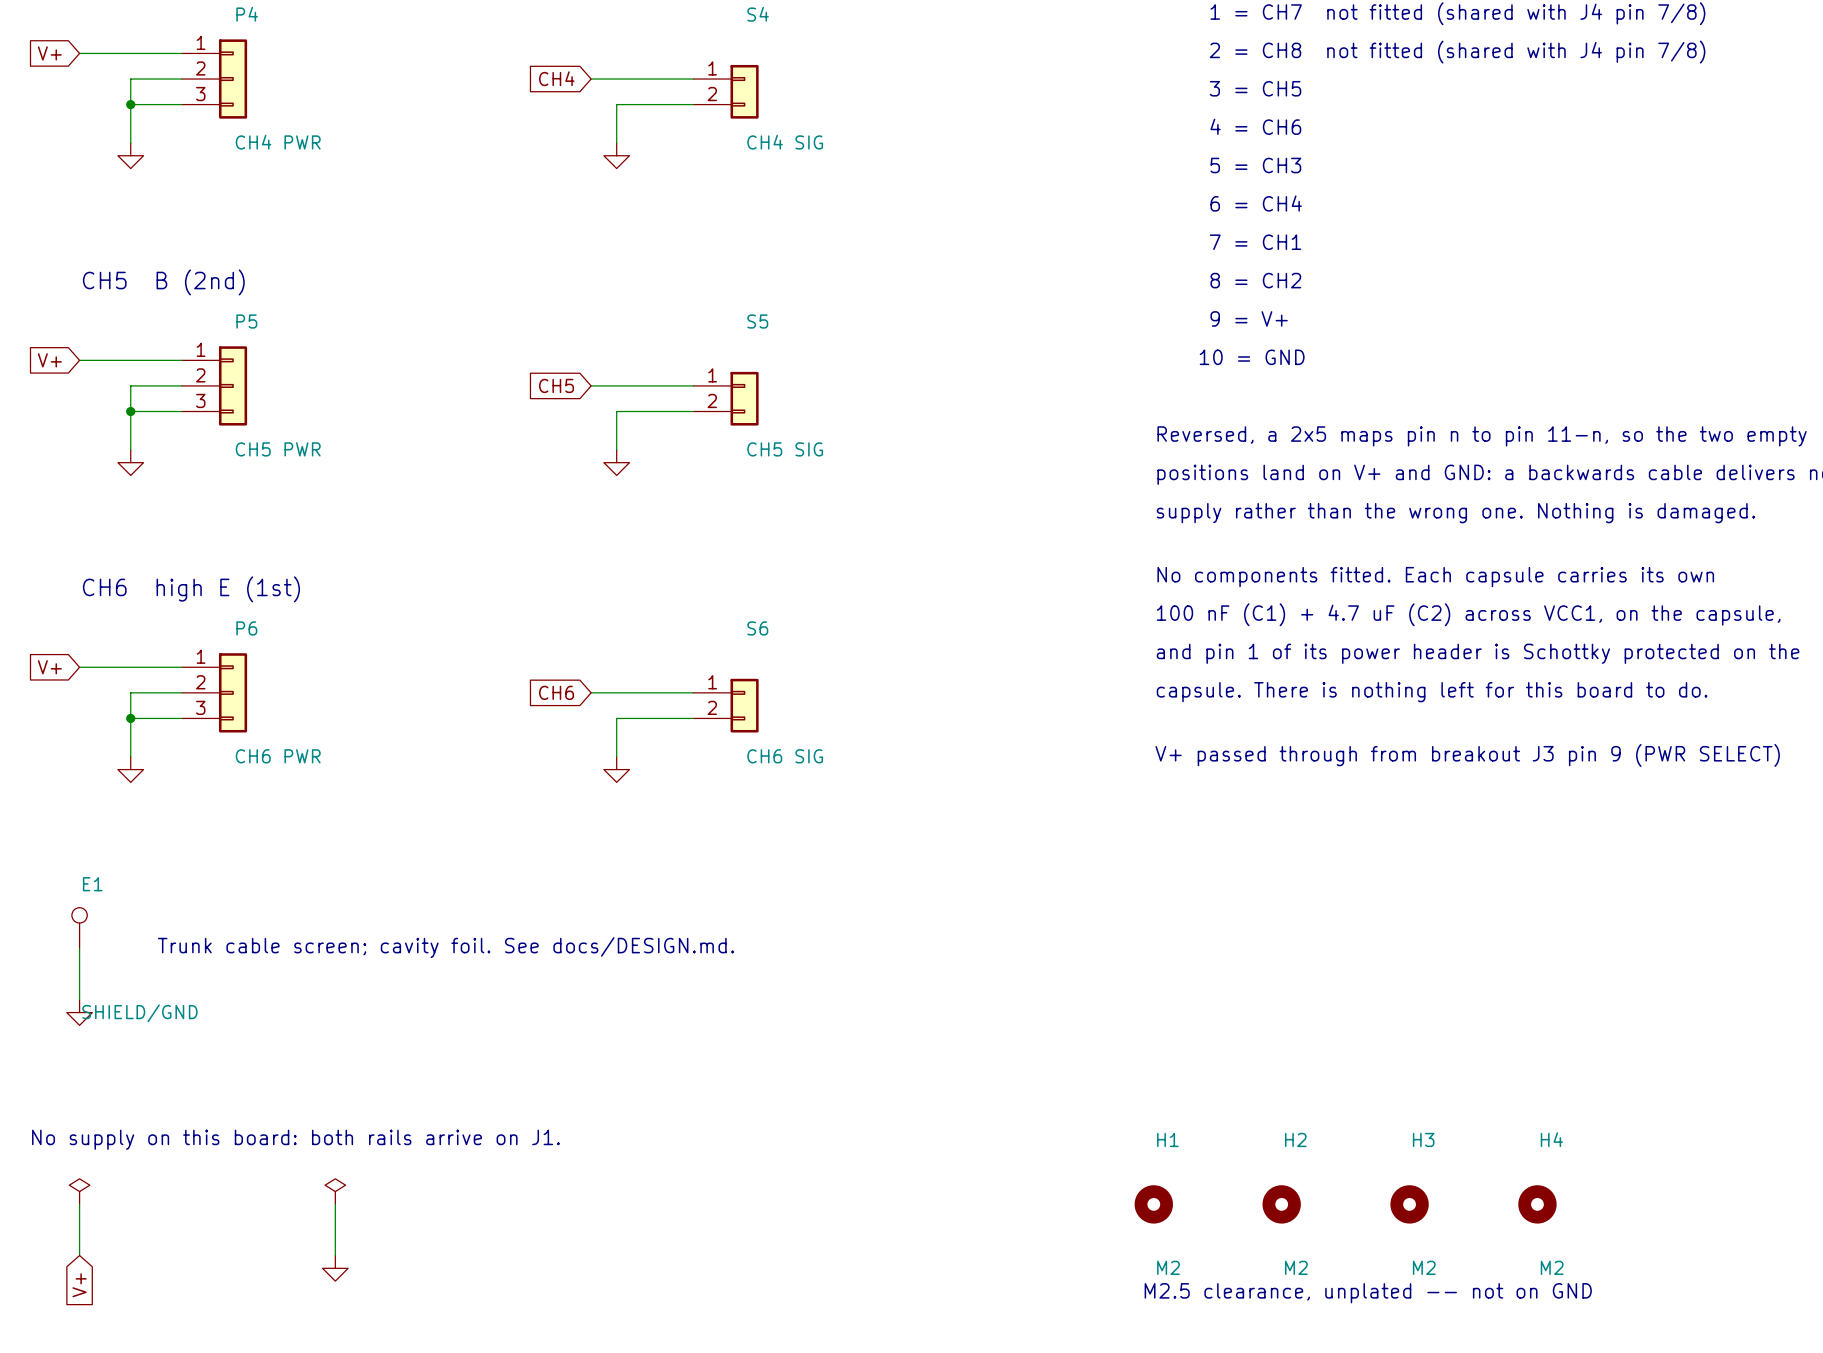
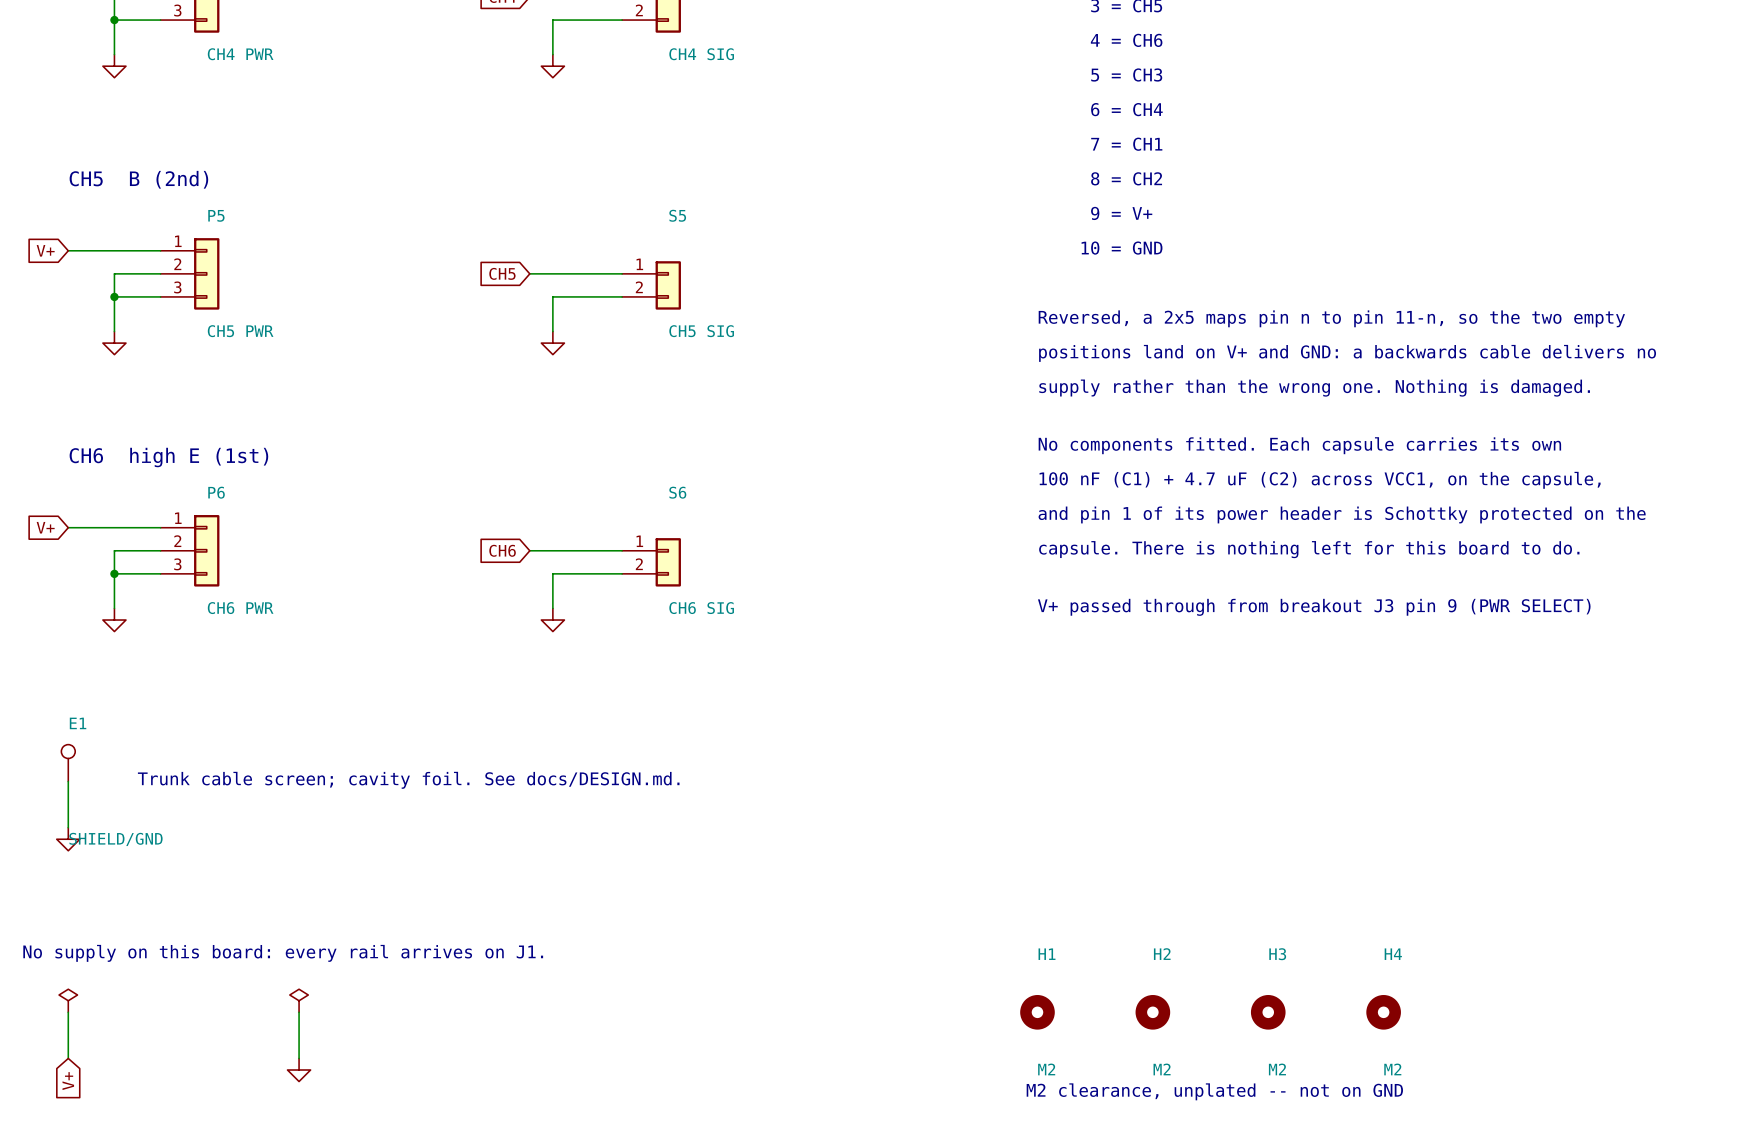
text: No supply on this board: both rails arrive on J1. (295, 1139) -> No supply on this board: every rail arrives on J1. (283, 953)
text: M2.5 clearance, unplated -- not on GND (1368, 1293) -> M2 clearance, unplated -- not on GND (1214, 1091)

